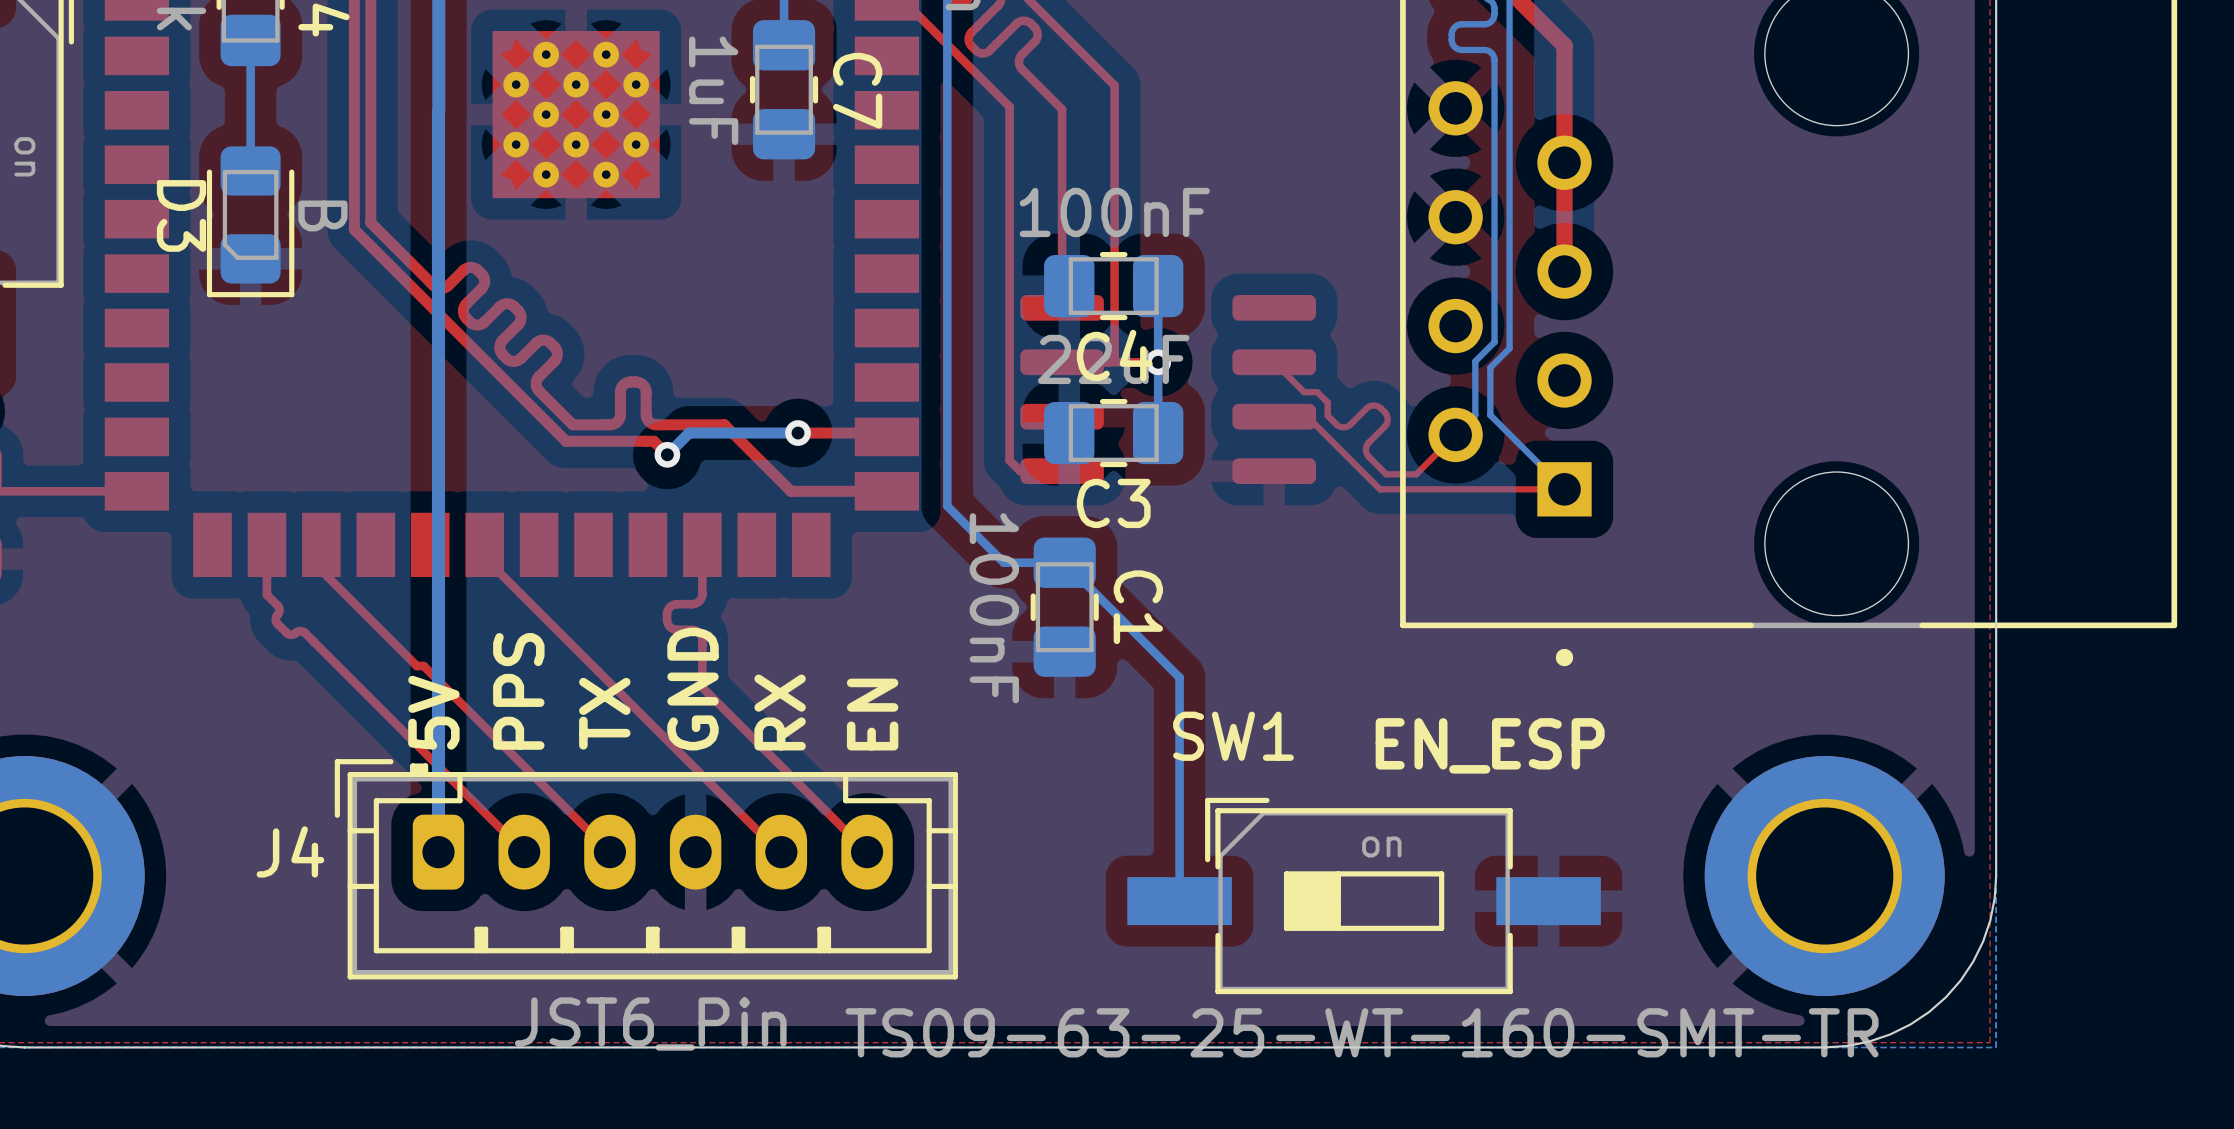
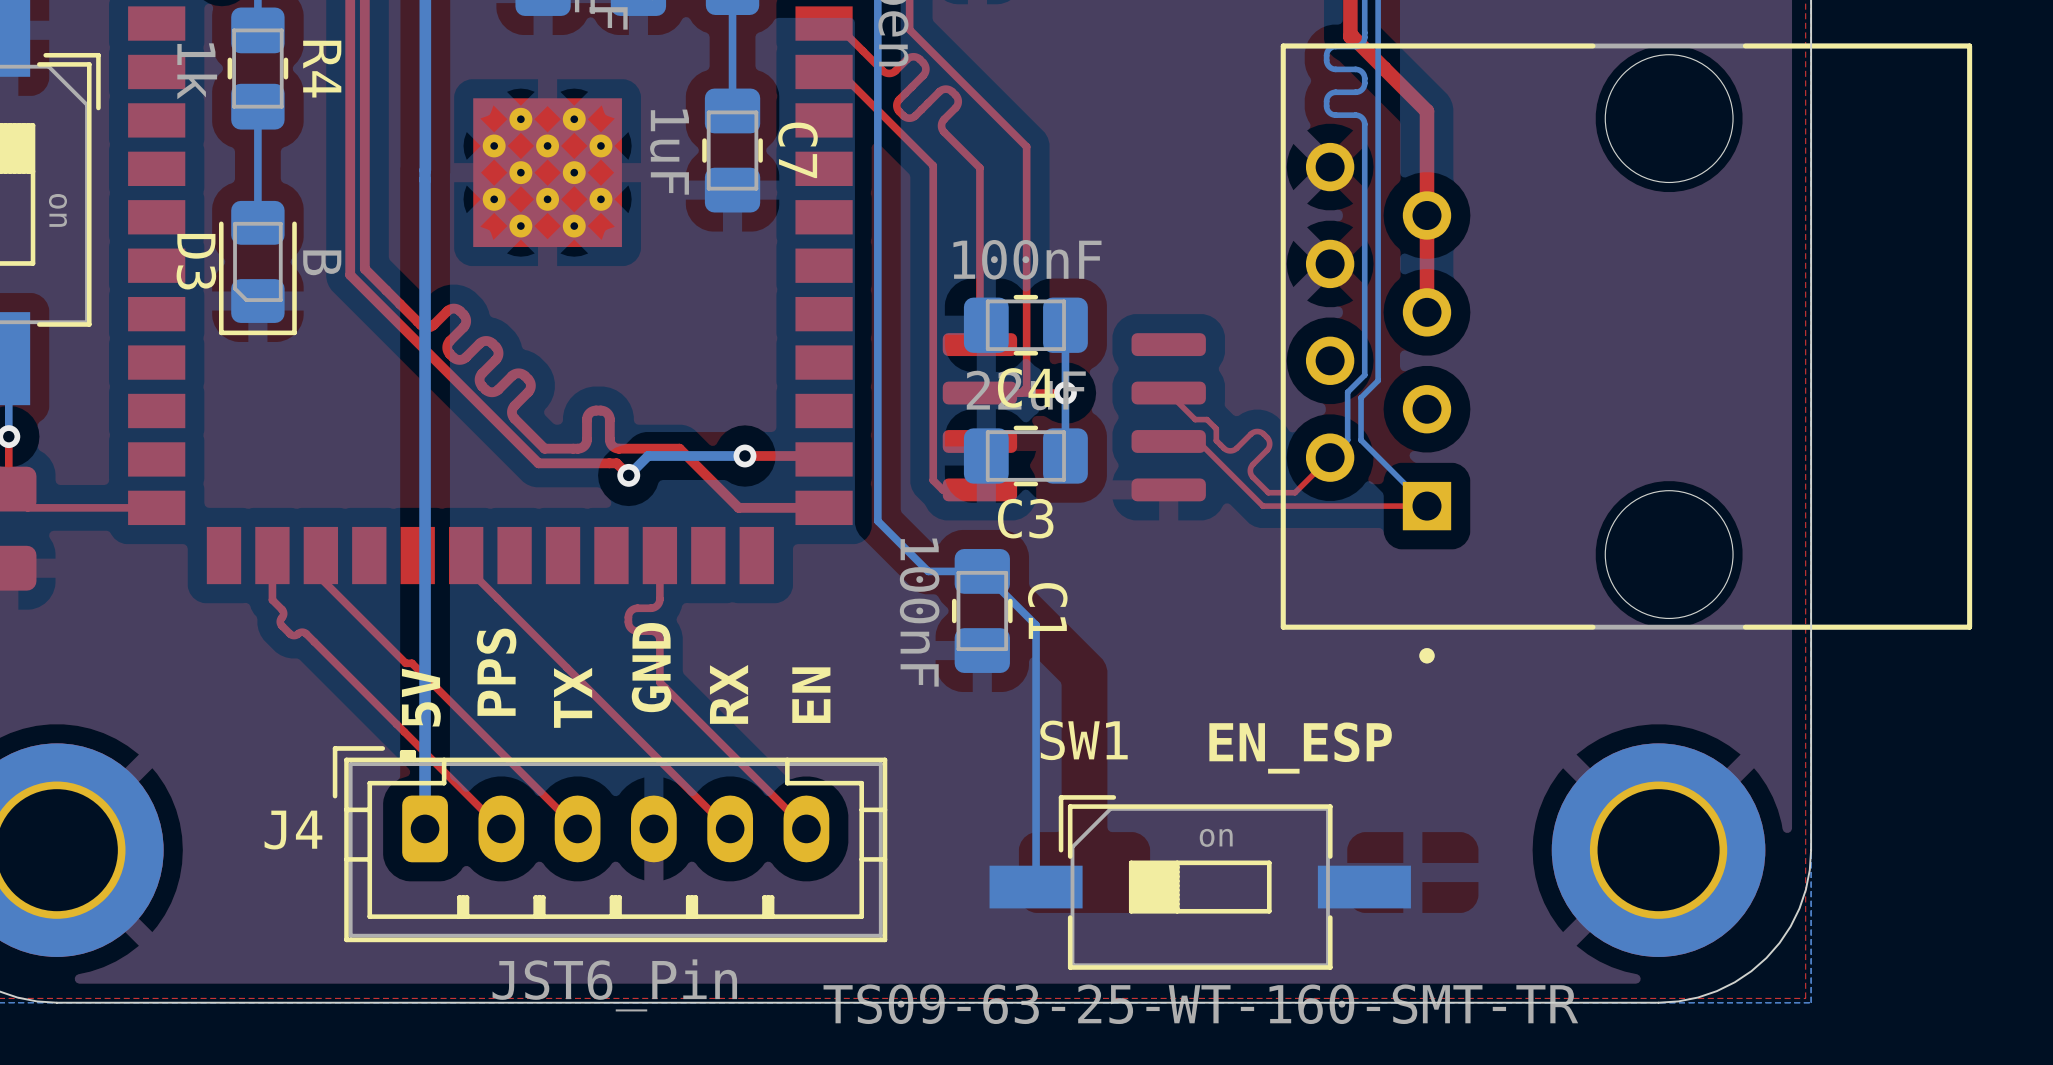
bottom track: (1125, 623) (1179, 677) (1179, 901) -> (1036, 625) (1036, 887)
text position: EN_ESP (1490, 745) -> EN_ESP (1300, 748)
SW1 position: (1364, 895) -> (1200, 882)

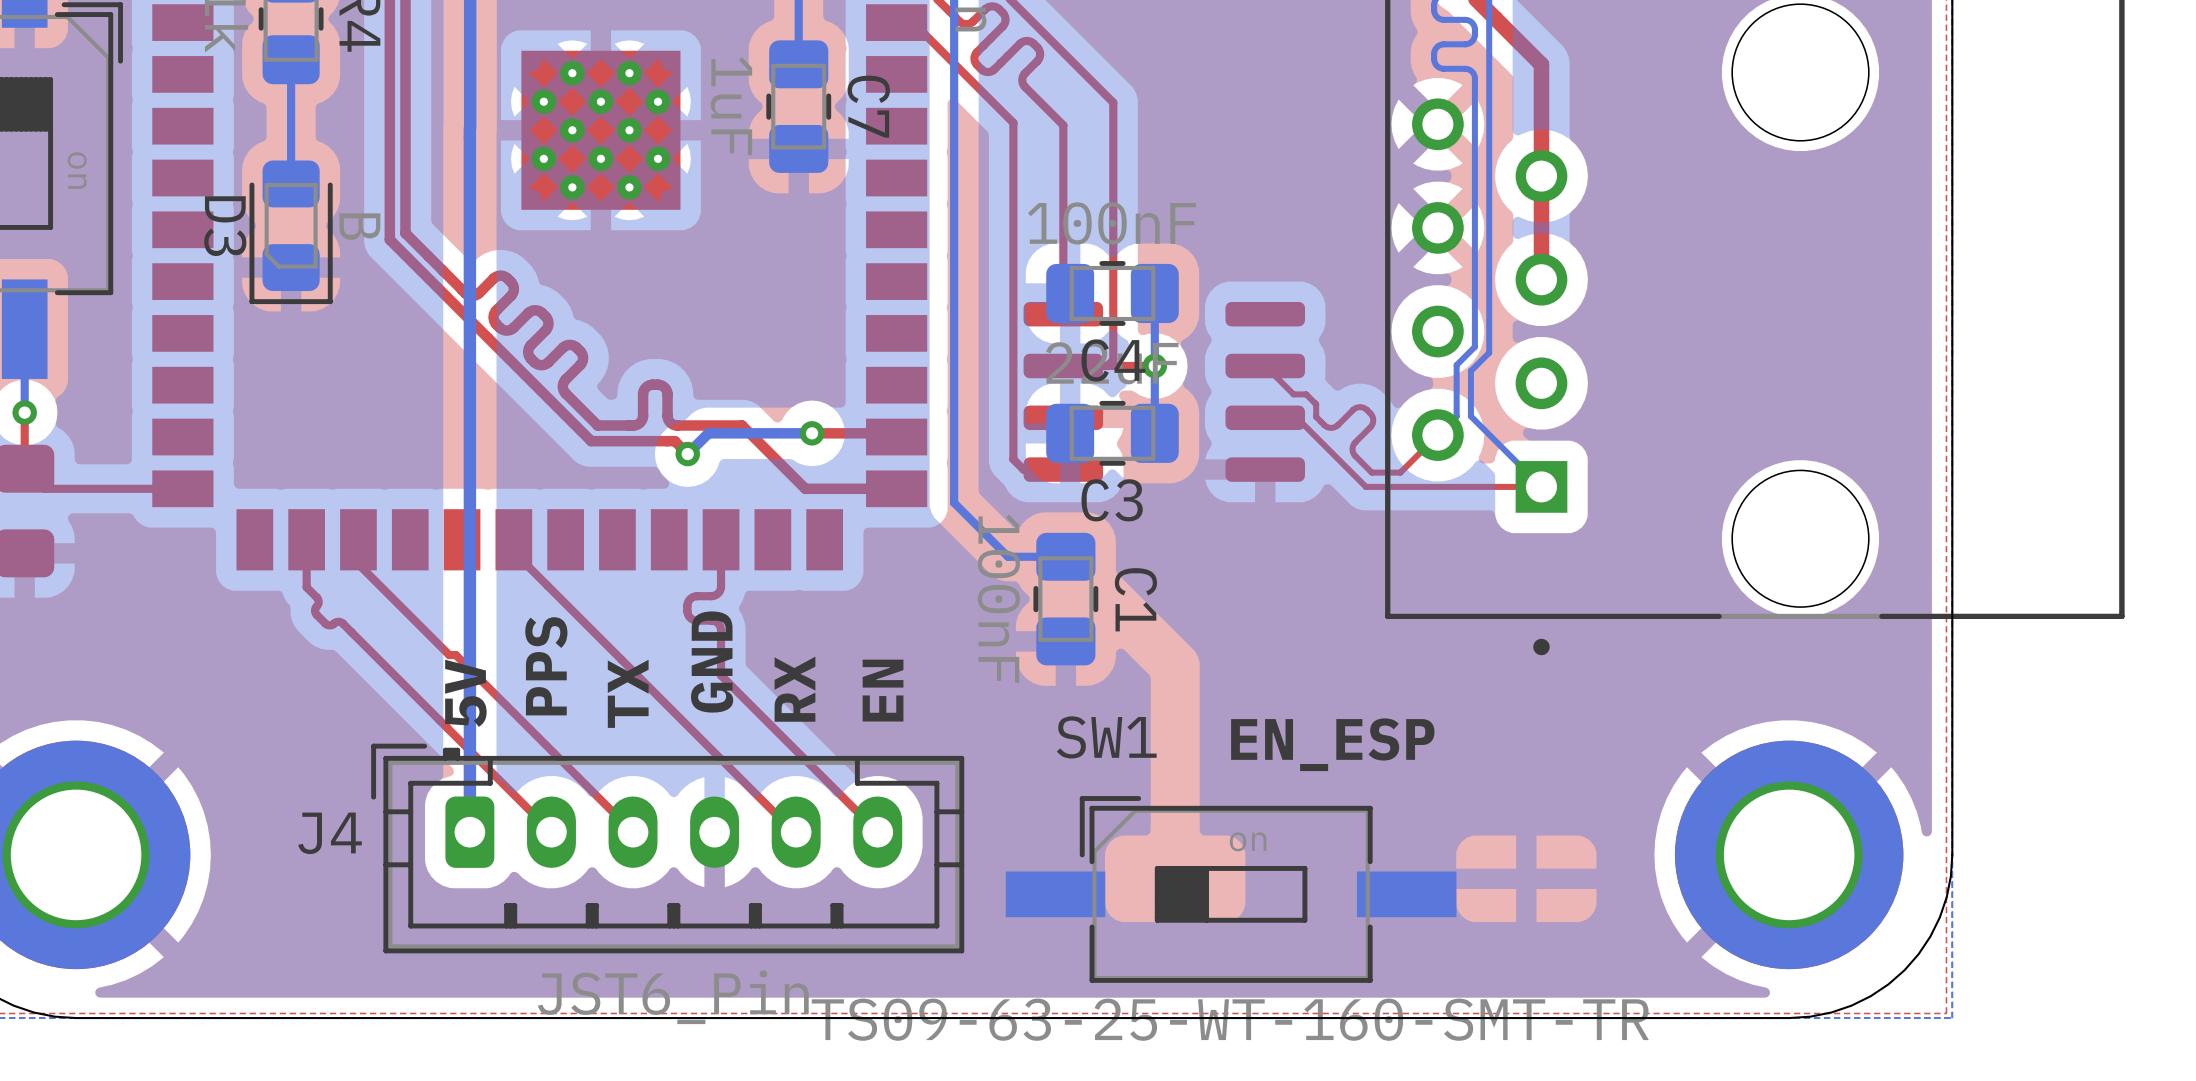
bottom track: (982, 571) (1036, 625) (1036, 887) -> none
text position: EN_ESP (1300, 748) -> EN_ESP (1332, 744)
SW1 position: (1200, 882) -> (1231, 889)

